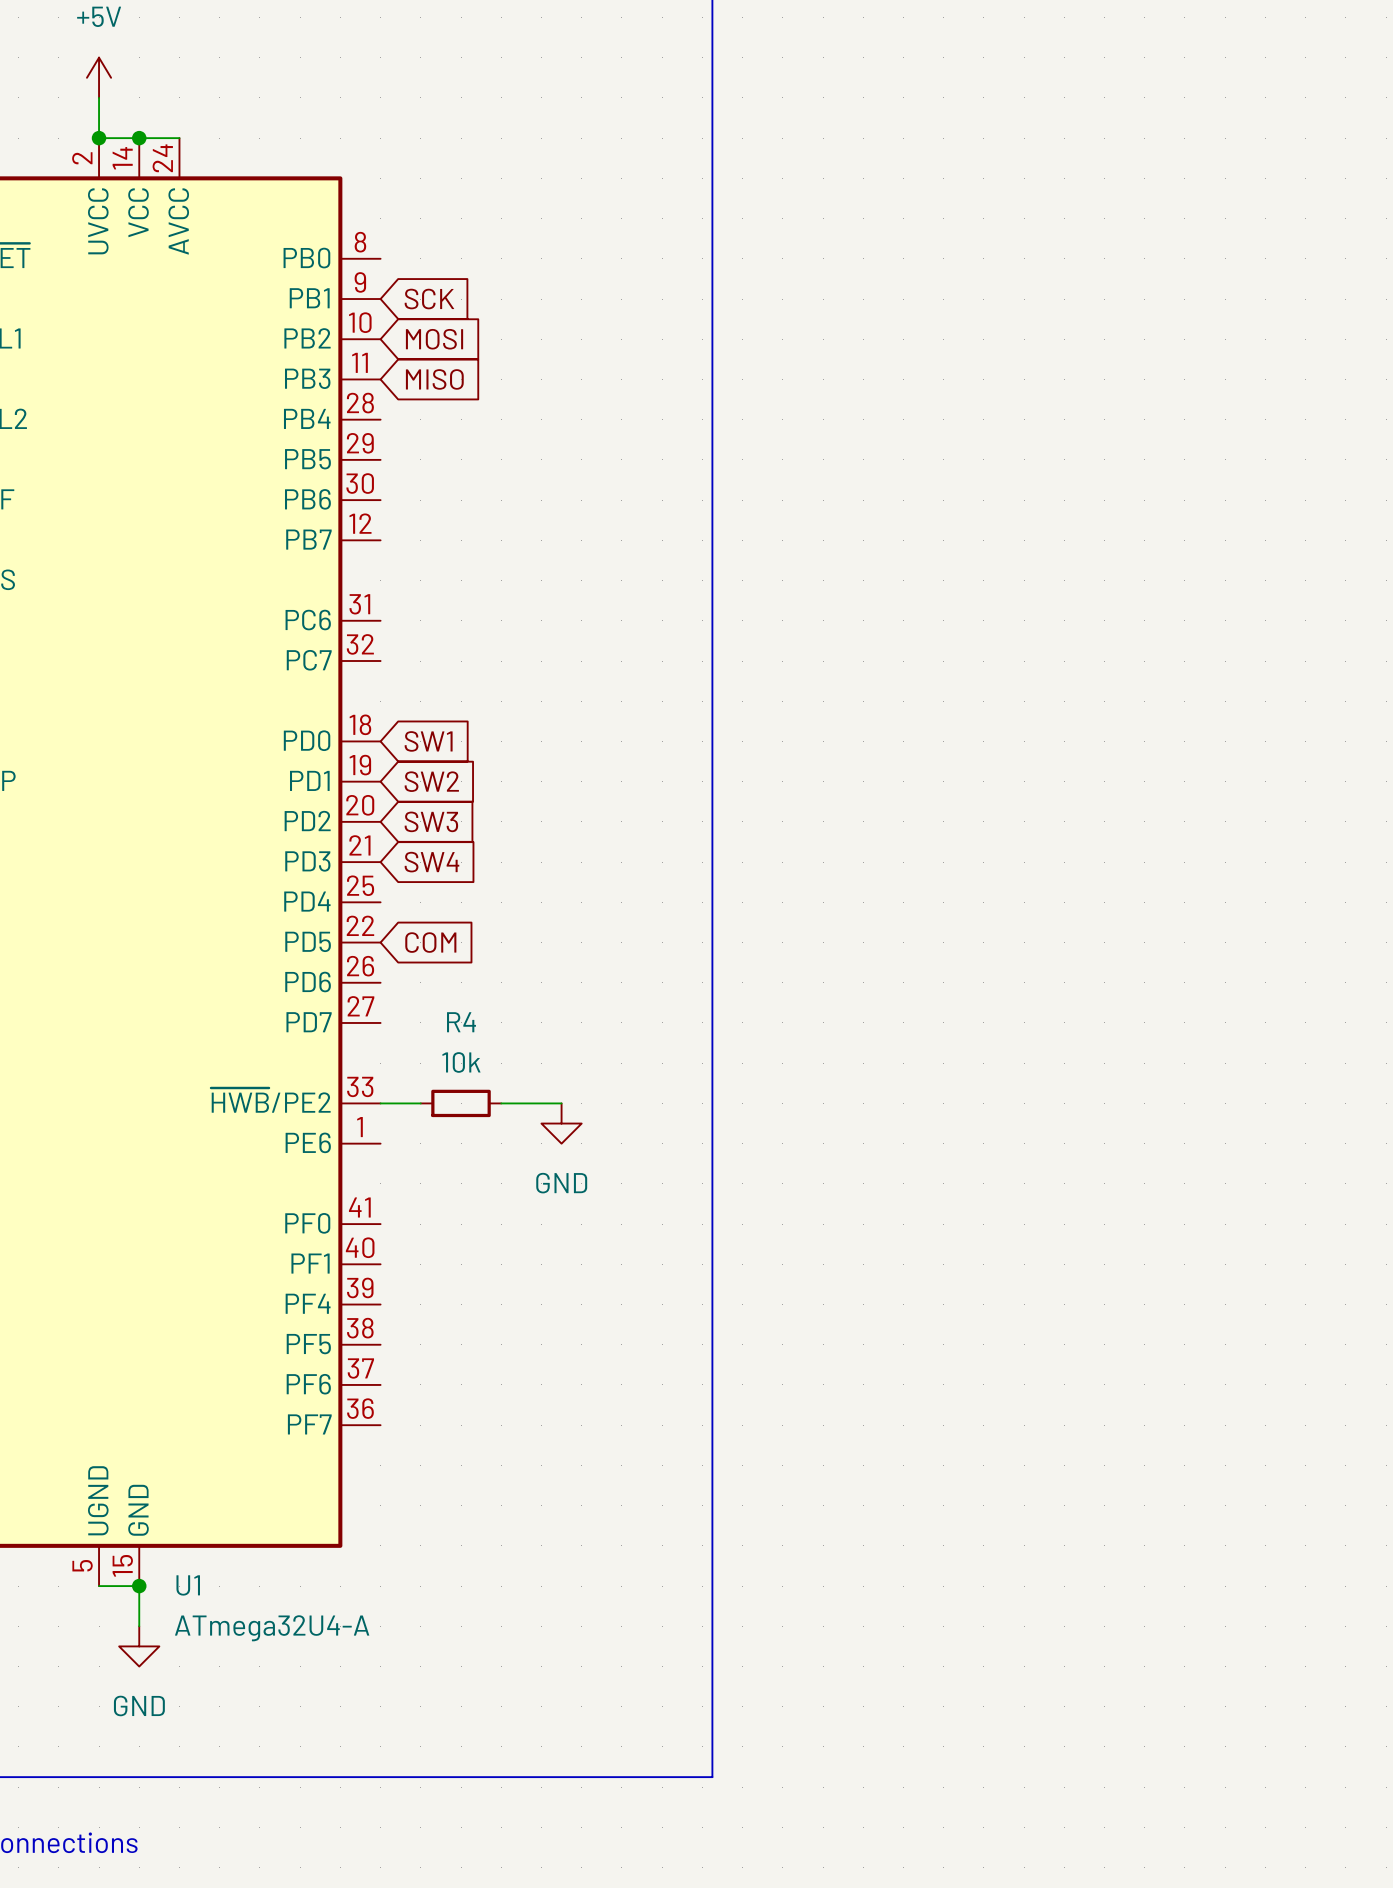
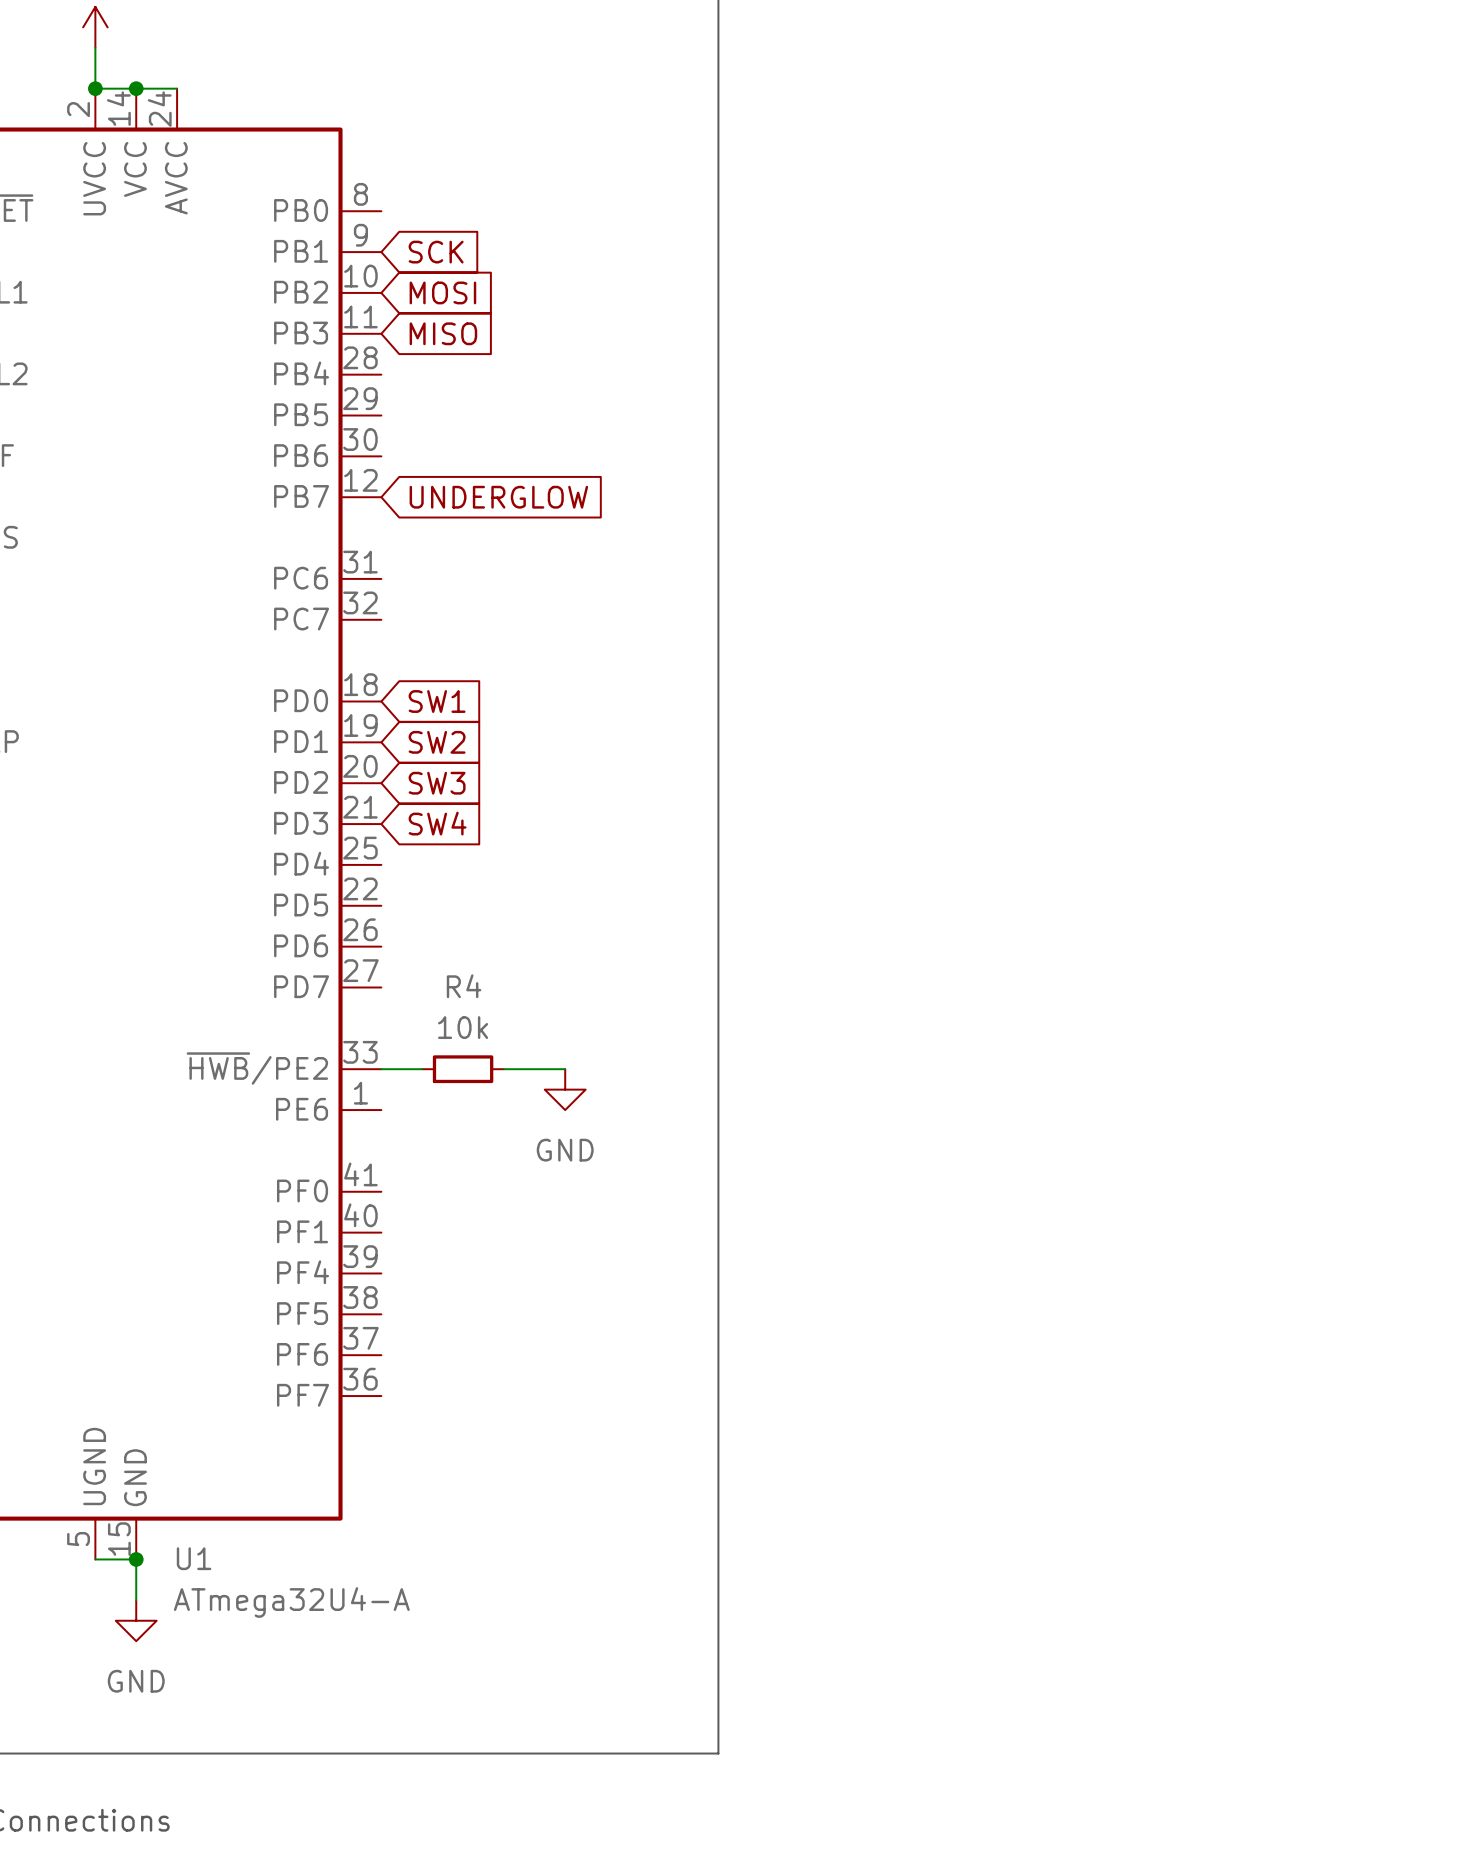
global label: none -> UNDERGLOW (498, 497)
global label: COM (430, 942) -> none

